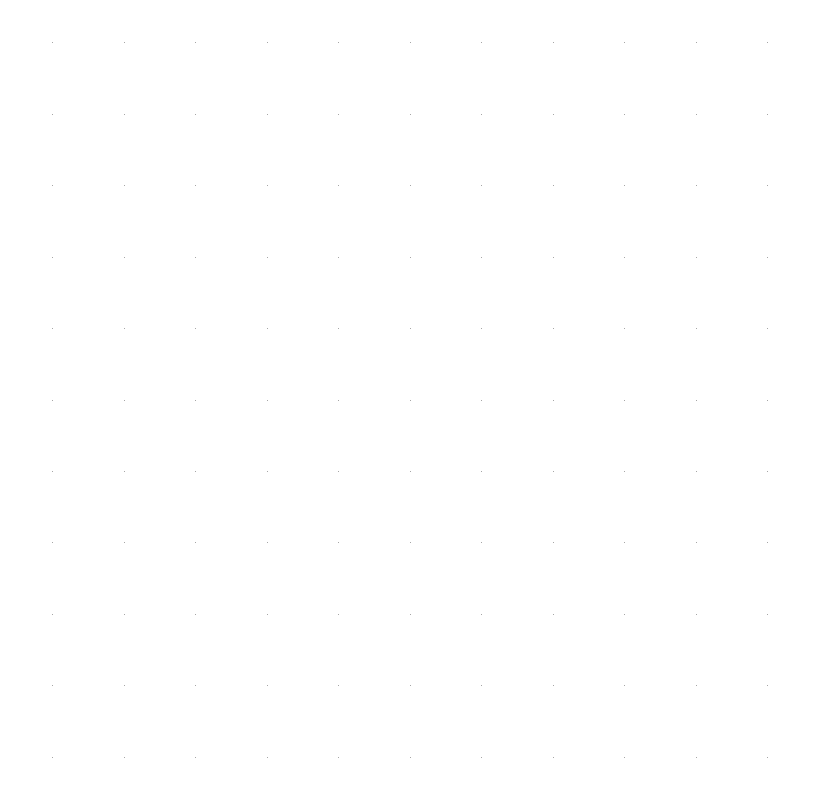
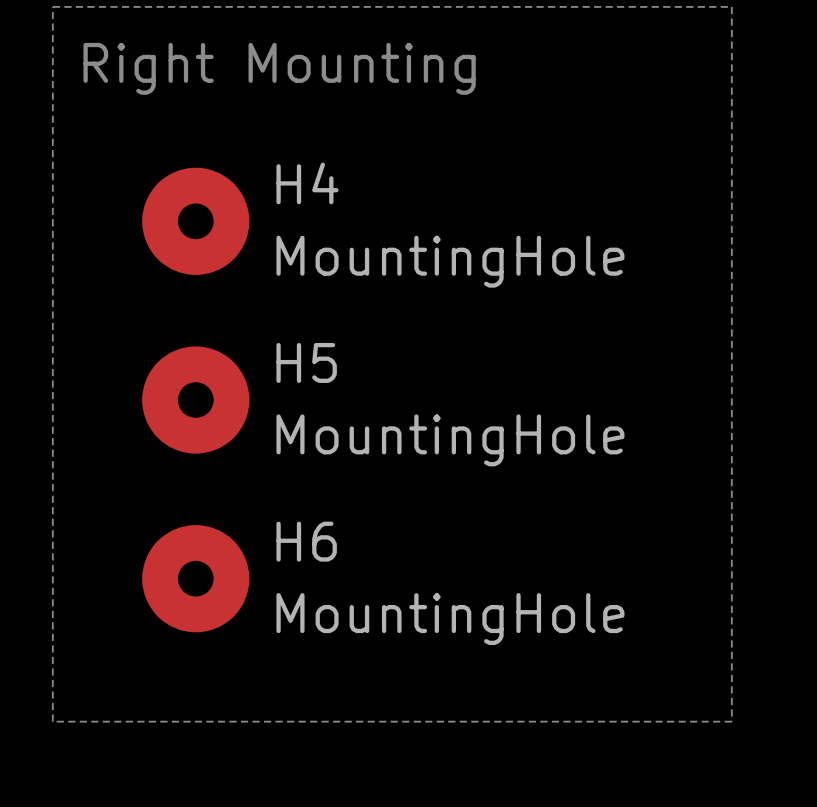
line: none -> (52, 6) (731, 6) (731, 721) (52, 721) (52, 6)
text: none -> Right Mounting (279, 68)
H4: none -> MountingHole (195, 221)
H5: none -> MountingHole (195, 400)
H6: none -> MountingHole (195, 578)

